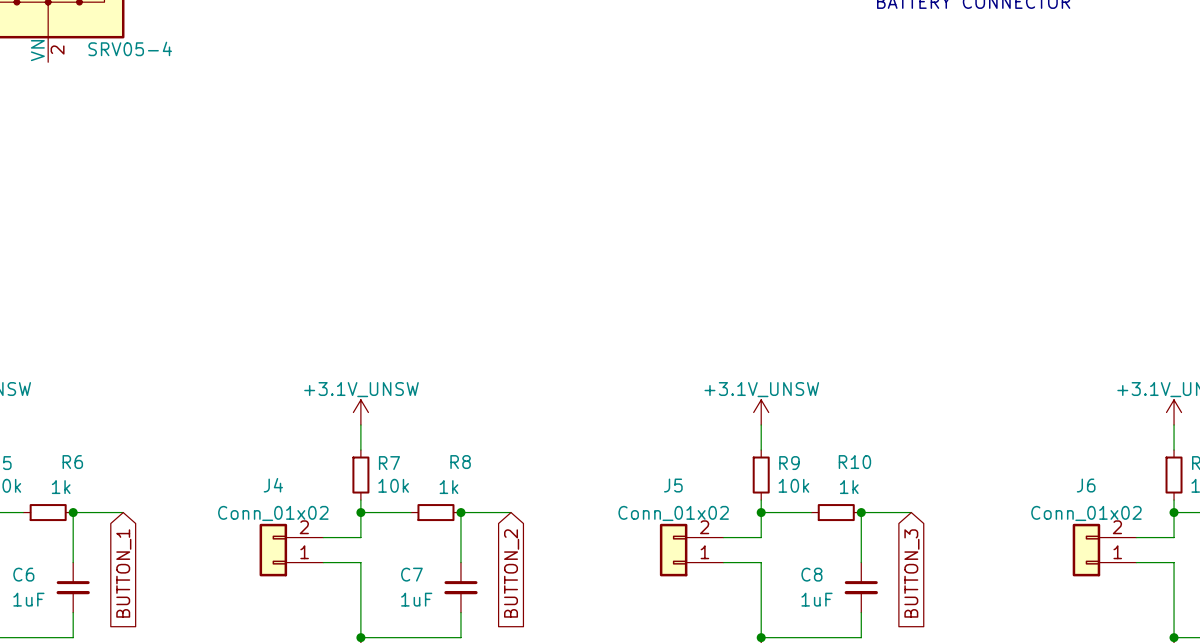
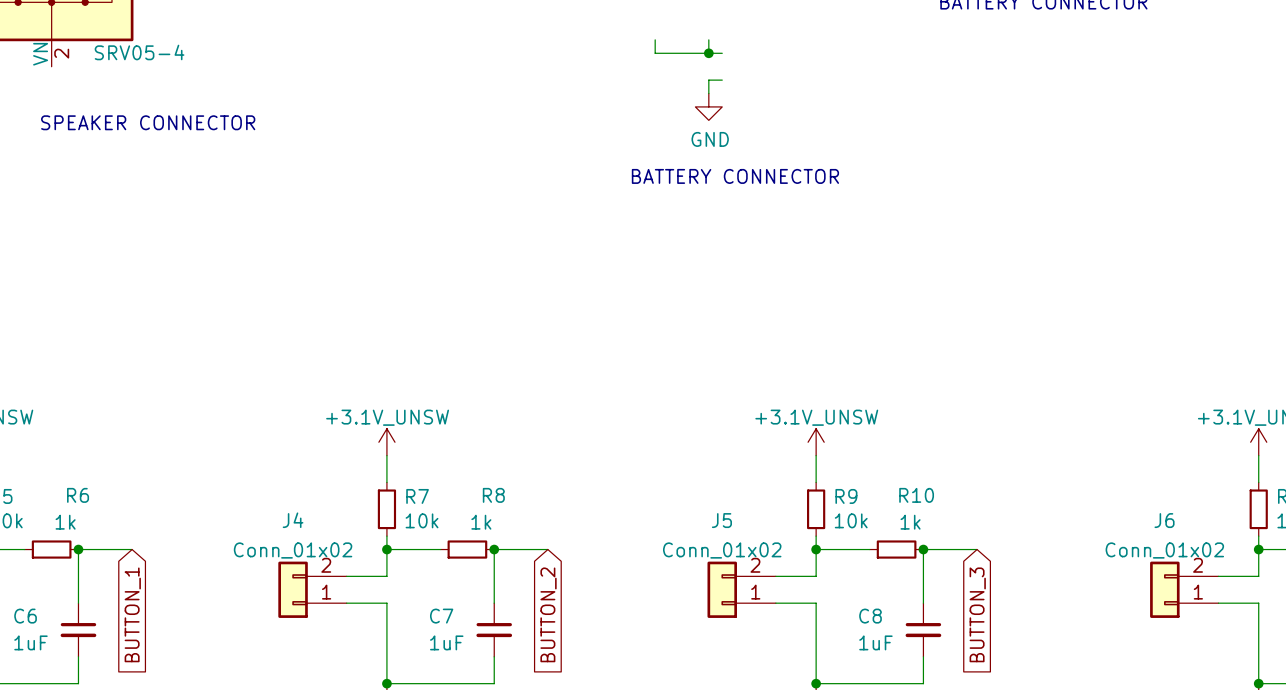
wire: none -> (655, 39) (655, 53) (722, 53)
wire: none -> (708, 39) (708, 53)
junction: none -> (708, 53)
wire: none -> (722, 80) (708, 80) (708, 93)
power symbol: none -> GND (708, 106)
text: none -> SPEAKER CONNECTOR (148, 122)
text: none -> BATTERY CONNECTOR (735, 176)

